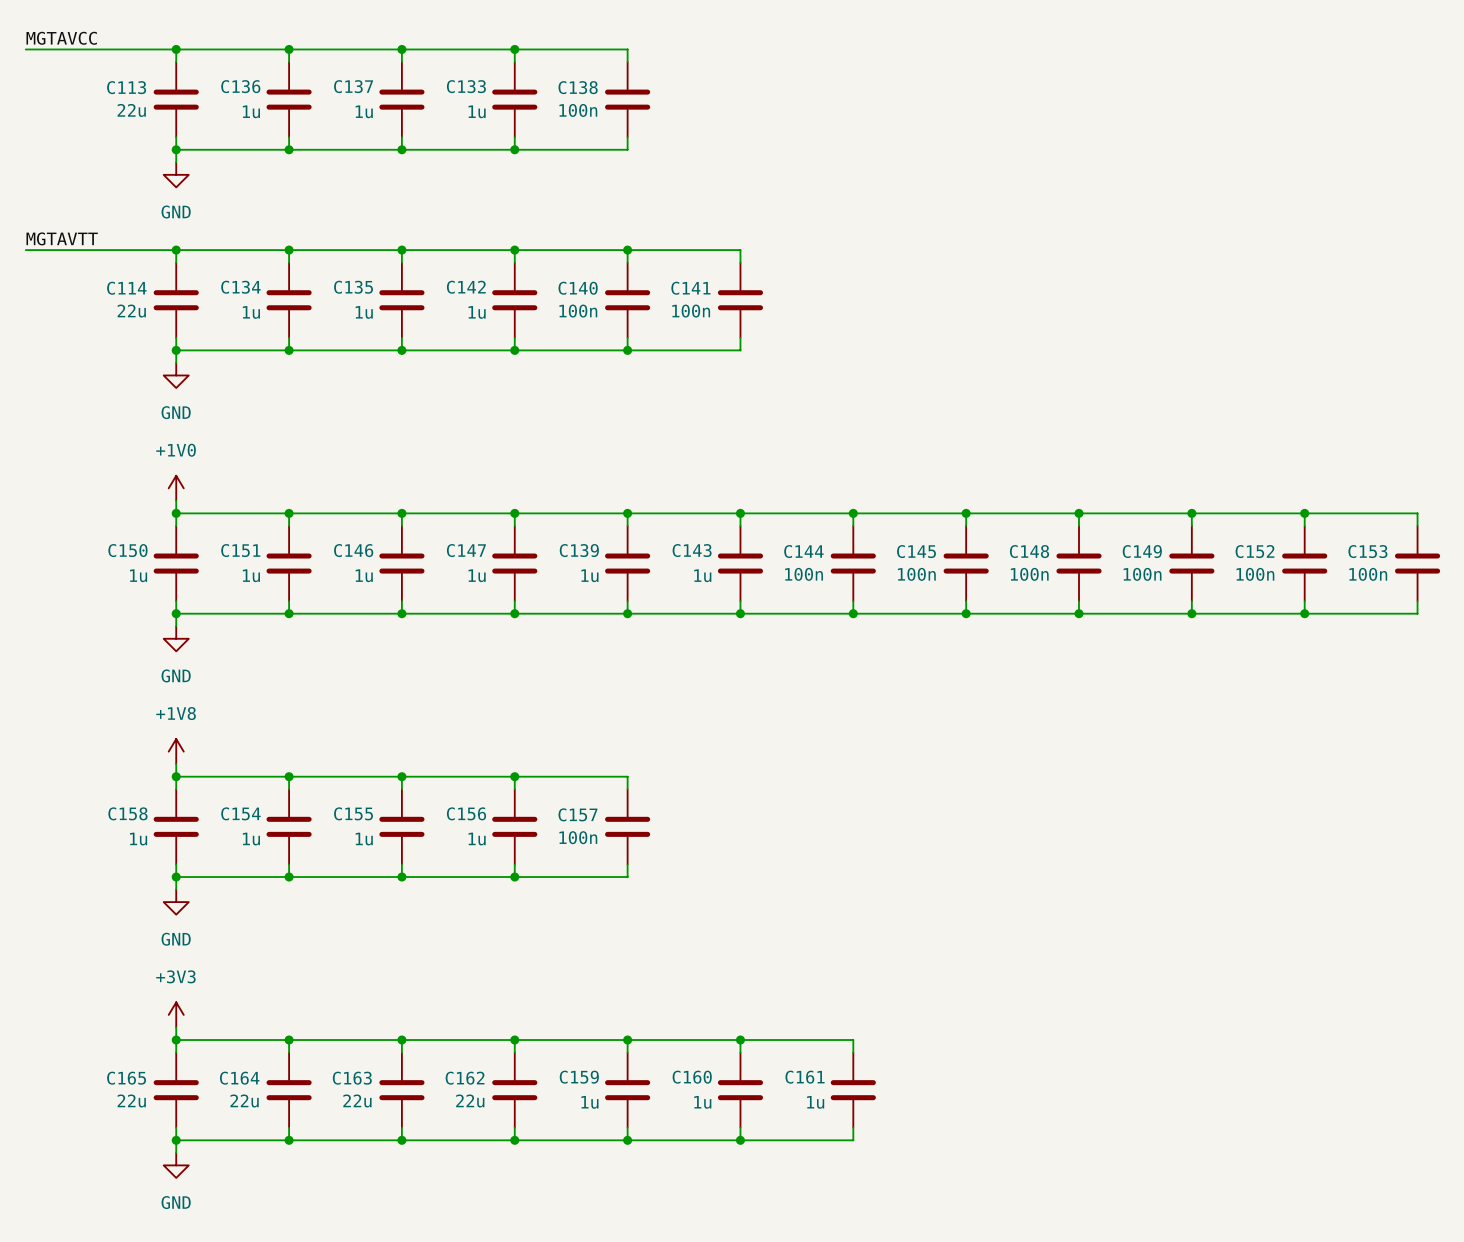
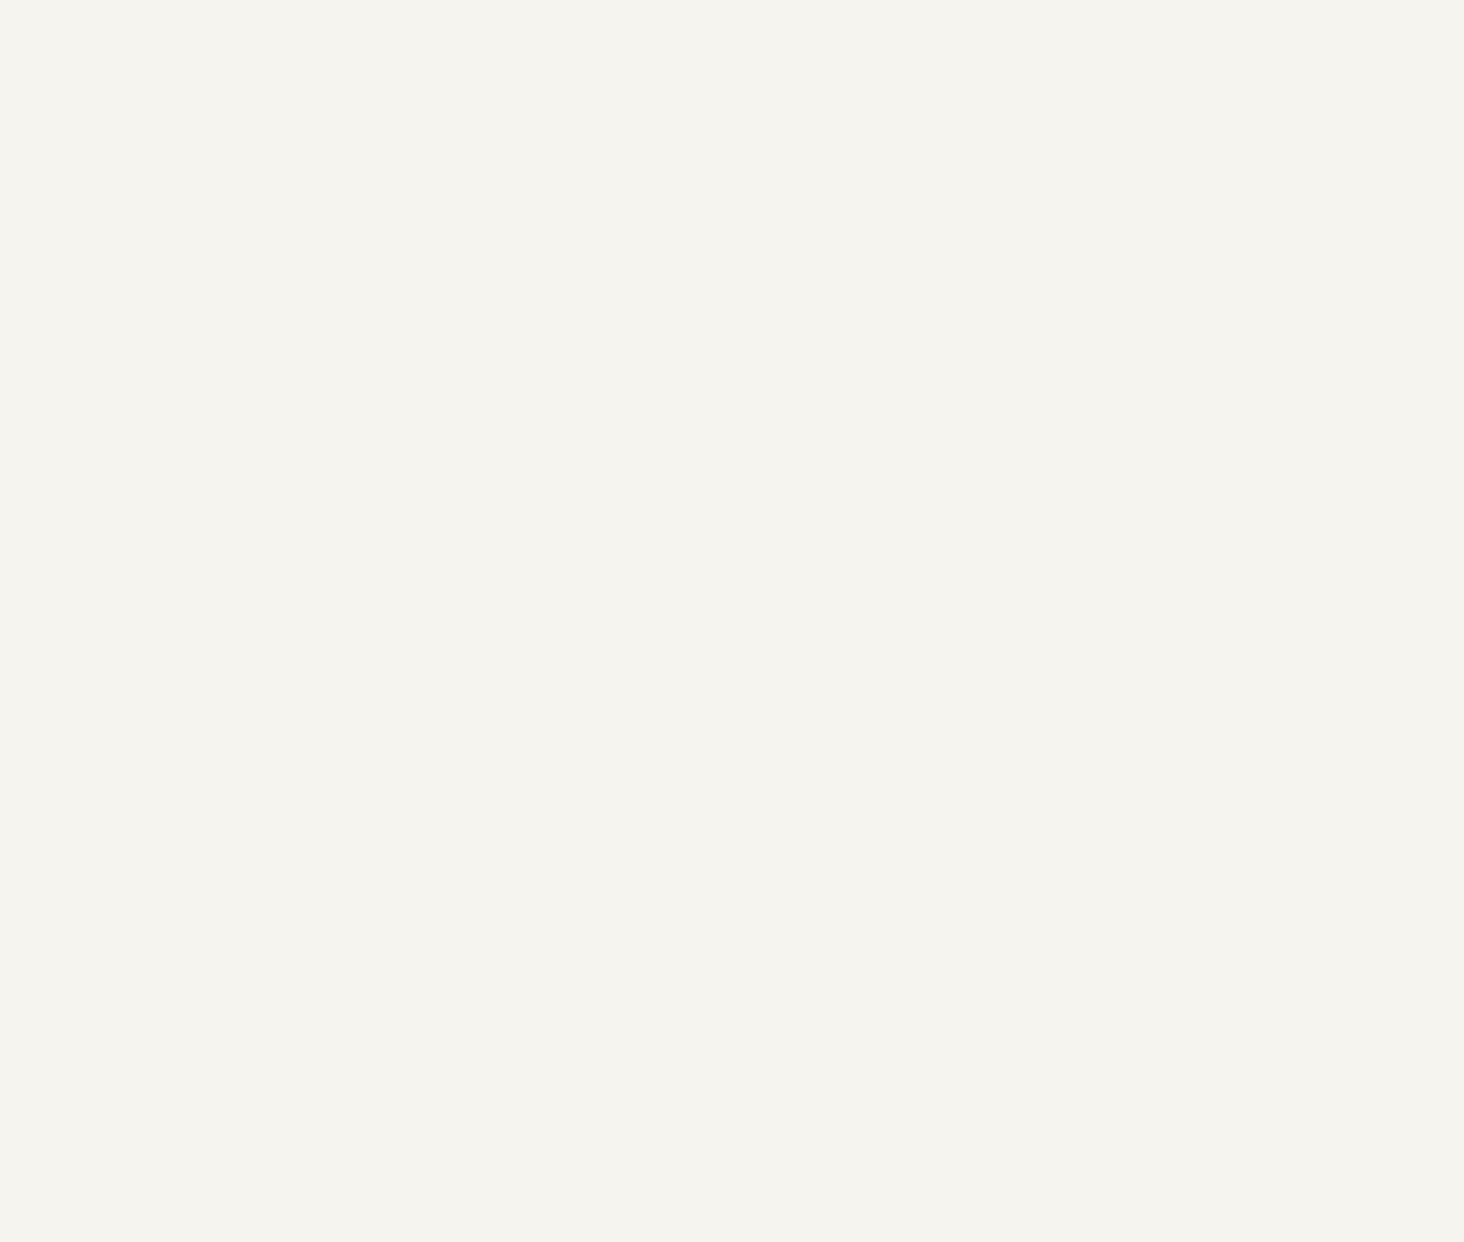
label: MGTAVCC (61, 38) -> none
wire: (25, 49) (627, 49) (627, 62) -> none
wire: (176, 49) (176, 62) -> none
junction: (176, 49) -> none
wire: (289, 49) (289, 62) -> none
junction: (289, 49) -> none
wire: (401, 49) (401, 62) -> none
junction: (401, 49) -> none
wire: (514, 49) (514, 62) -> none
junction: (514, 49) -> none
C113: 22u (176, 99) -> none
C136: 1u (289, 99) -> none
C137: 1u (401, 99) -> none
C133: 1u (514, 99) -> none
C138: 100n (627, 99) -> none
wire: (176, 137) (176, 162) -> none
wire: (289, 137) (289, 149) -> none
wire: (401, 137) (401, 149) -> none
wire: (514, 137) (514, 149) -> none
wire: (627, 137) (627, 149) (176, 149) -> none
junction: (176, 149) -> none
junction: (289, 149) -> none
junction: (401, 149) -> none
junction: (514, 149) -> none
power symbol: GND (176, 174) -> none
label: MGTAVTT (62, 238) -> none
wire: (25, 250) (740, 250) (740, 262) -> none
wire: (176, 250) (176, 262) -> none
junction: (176, 250) -> none
wire: (289, 250) (289, 262) -> none
junction: (289, 250) -> none
wire: (401, 250) (401, 262) -> none
junction: (401, 250) -> none
wire: (514, 250) (514, 262) -> none
junction: (514, 250) -> none
wire: (627, 250) (627, 262) -> none
junction: (627, 250) -> none
C114: 22u (176, 300) -> none
C134: 1u (289, 300) -> none
C135: 1u (401, 300) -> none
C142: 1u (514, 300) -> none
C140: 100n (627, 300) -> none
C141: 100n (740, 300) -> none
wire: (176, 337) (176, 362) -> none
wire: (289, 337) (289, 350) -> none
wire: (401, 337) (401, 350) -> none
wire: (514, 337) (514, 350) -> none
wire: (627, 337) (627, 350) -> none
wire: (740, 337) (740, 350) (176, 350) -> none
junction: (176, 350) -> none
junction: (289, 350) -> none
junction: (401, 350) -> none
junction: (514, 350) -> none
junction: (627, 350) -> none
power symbol: GND (176, 375) -> none
power symbol: +1V0 (176, 488) -> none
wire: (176, 500) (176, 525) -> none
wire: (176, 513) (1417, 513) (1417, 525) -> none
junction: (176, 513) -> none
wire: (289, 513) (289, 525) -> none
junction: (289, 513) -> none
wire: (401, 513) (401, 525) -> none
junction: (401, 513) -> none
wire: (514, 513) (514, 525) -> none
junction: (514, 513) -> none
wire: (627, 513) (627, 525) -> none
junction: (627, 513) -> none
wire: (740, 513) (740, 525) -> none
junction: (740, 513) -> none
wire: (853, 513) (853, 525) -> none
junction: (853, 513) -> none
wire: (966, 513) (966, 525) -> none
junction: (966, 513) -> none
wire: (1079, 513) (1079, 525) -> none
junction: (1079, 513) -> none
wire: (1191, 513) (1191, 525) -> none
junction: (1191, 513) -> none
wire: (1304, 513) (1304, 525) -> none
junction: (1304, 513) -> none
C150: 1u (176, 563) -> none
C151: 1u (289, 563) -> none
C146: 1u (401, 563) -> none
C147: 1u (514, 563) -> none
C139: 1u (627, 563) -> none
C143: 1u (740, 563) -> none
C144: 100n (853, 563) -> none
C145: 100n (966, 563) -> none
C148: 100n (1079, 563) -> none
C149: 100n (1191, 563) -> none
C152: 100n (1304, 563) -> none
C153: 100n (1417, 563) -> none
wire: (176, 601) (176, 626) -> none
wire: (289, 601) (289, 613) -> none
wire: (401, 601) (401, 613) -> none
wire: (514, 601) (514, 613) -> none
wire: (627, 601) (627, 613) -> none
wire: (740, 601) (740, 613) -> none
wire: (853, 601) (853, 613) -> none
wire: (966, 601) (966, 613) -> none
wire: (1079, 601) (1079, 613) -> none
wire: (1191, 601) (1191, 613) -> none
wire: (1304, 601) (1304, 613) -> none
wire: (1417, 601) (1417, 613) (176, 613) -> none
junction: (176, 613) -> none
junction: (289, 613) -> none
junction: (401, 613) -> none
junction: (514, 613) -> none
junction: (627, 613) -> none
junction: (740, 613) -> none
junction: (853, 613) -> none
junction: (966, 613) -> none
junction: (1079, 613) -> none
junction: (1191, 613) -> none
junction: (1304, 613) -> none
power symbol: GND (176, 638) -> none
power symbol: +1V8 (176, 751) -> none
wire: (176, 764) (176, 789) -> none
wire: (176, 776) (627, 776) (627, 789) -> none
junction: (176, 776) -> none
wire: (289, 776) (289, 789) -> none
junction: (289, 776) -> none
wire: (401, 776) (401, 789) -> none
junction: (401, 776) -> none
wire: (514, 776) (514, 789) -> none
junction: (514, 776) -> none
C158: 1u (176, 826) -> none
C154: 1u (289, 826) -> none
C155: 1u (401, 826) -> none
C156: 1u (514, 826) -> none
C157: 100n (627, 826) -> none
wire: (176, 864) (176, 889) -> none
wire: (289, 864) (289, 877) -> none
wire: (401, 864) (401, 877) -> none
wire: (514, 864) (514, 877) -> none
wire: (627, 864) (627, 877) (176, 877) -> none
junction: (176, 877) -> none
junction: (289, 877) -> none
junction: (401, 877) -> none
junction: (514, 877) -> none
power symbol: GND (176, 902) -> none
power symbol: +3V3 (176, 1014) -> none
wire: (176, 1027) (176, 1052) -> none
wire: (176, 1040) (853, 1040) (853, 1052) -> none
junction: (176, 1040) -> none
wire: (289, 1040) (289, 1052) -> none
junction: (289, 1040) -> none
wire: (401, 1040) (401, 1052) -> none
junction: (401, 1040) -> none
wire: (514, 1040) (514, 1052) -> none
junction: (514, 1040) -> none
wire: (627, 1040) (627, 1052) -> none
junction: (627, 1040) -> none
wire: (740, 1040) (740, 1052) -> none
junction: (740, 1040) -> none
C165: 22u (176, 1090) -> none
C164: 22u (289, 1090) -> none
C163: 22u (401, 1090) -> none
C162: 22u (514, 1090) -> none
C159: 1u (627, 1090) -> none
C160: 1u (740, 1090) -> none
C161: 1u (853, 1090) -> none
wire: (176, 1127) (176, 1152) -> none
wire: (289, 1127) (289, 1140) -> none
wire: (401, 1127) (401, 1140) -> none
wire: (514, 1127) (514, 1140) -> none
wire: (627, 1127) (627, 1140) -> none
wire: (740, 1127) (740, 1140) -> none
wire: (853, 1127) (853, 1140) (176, 1140) -> none
junction: (176, 1140) -> none
junction: (289, 1140) -> none
junction: (401, 1140) -> none
junction: (514, 1140) -> none
junction: (627, 1140) -> none
junction: (740, 1140) -> none
power symbol: GND (176, 1165) -> none

